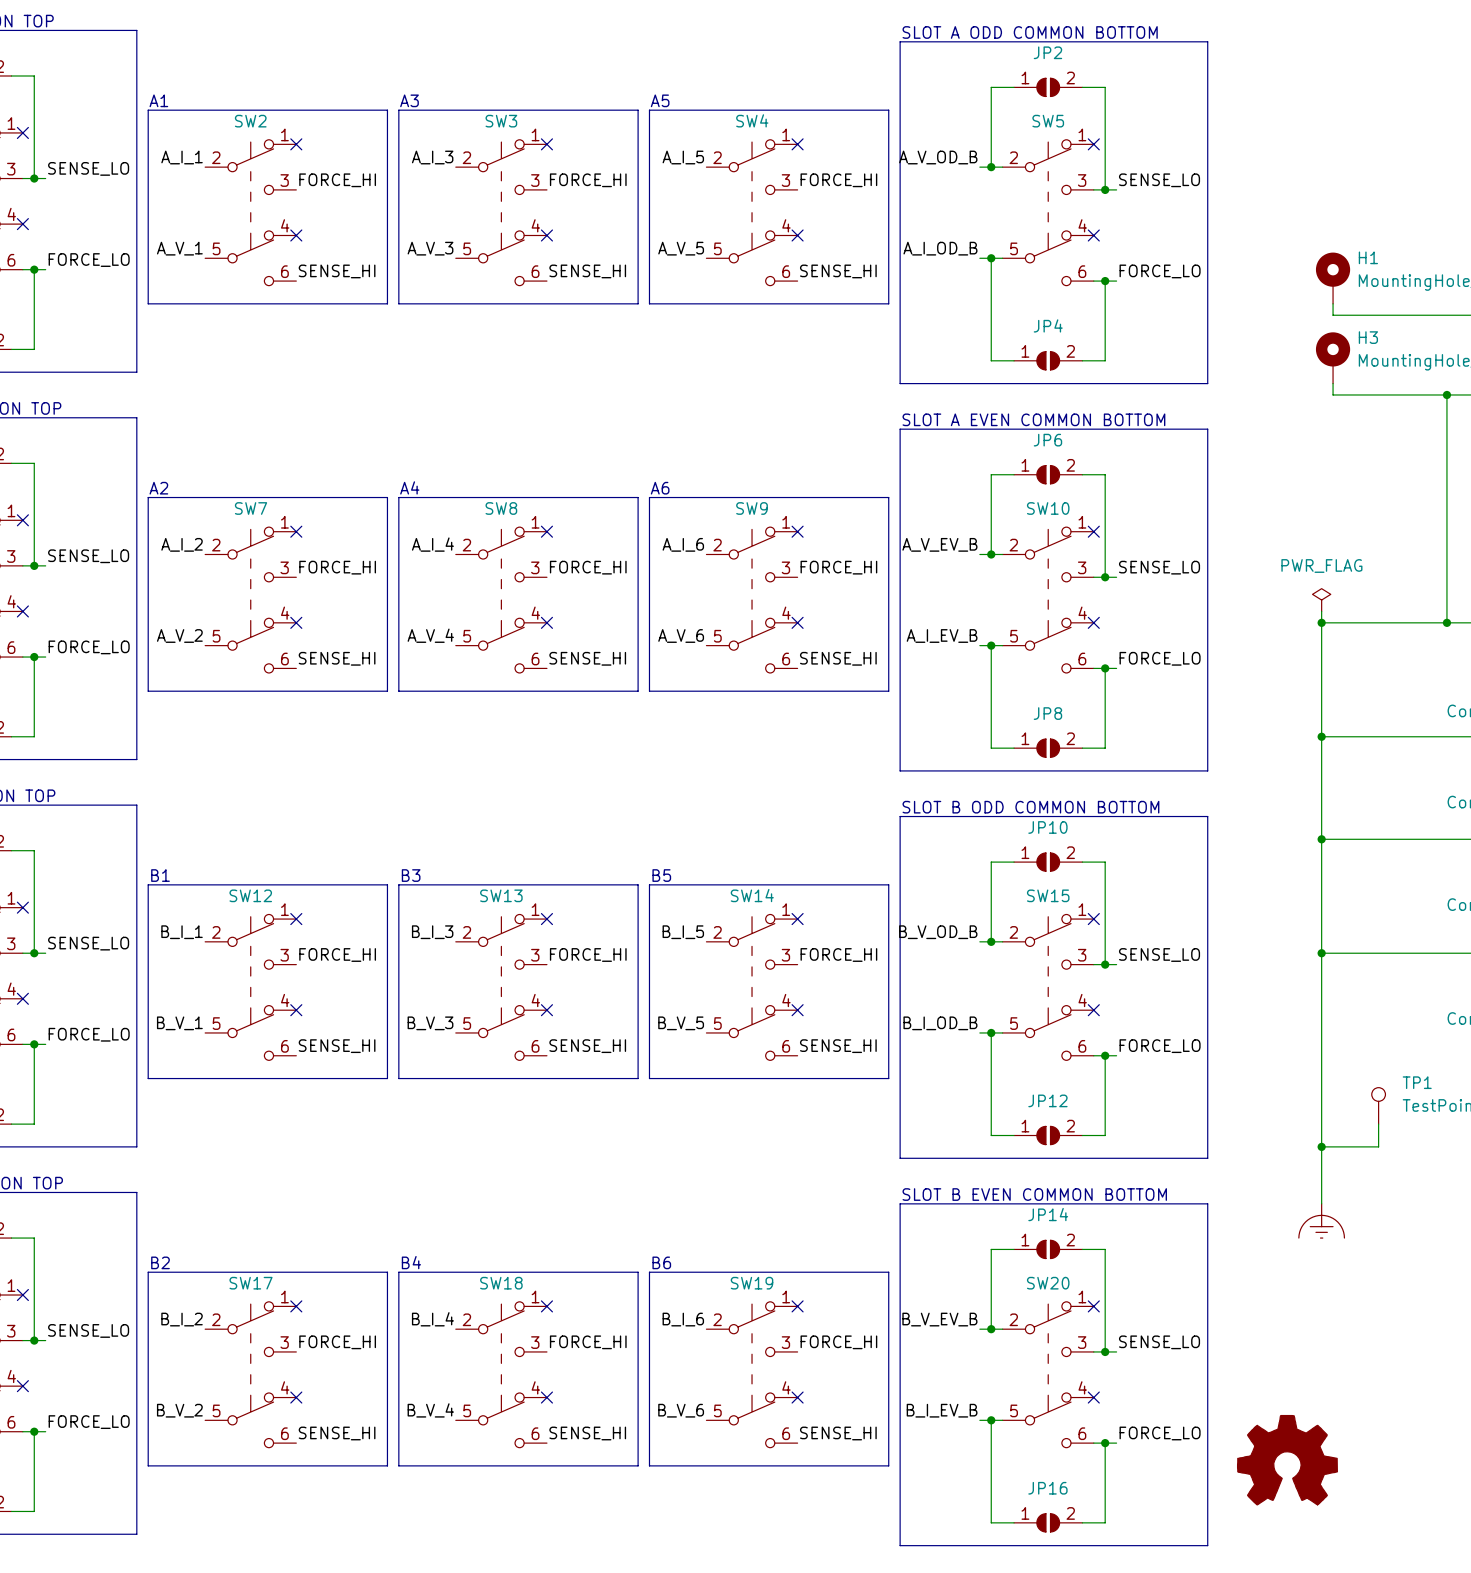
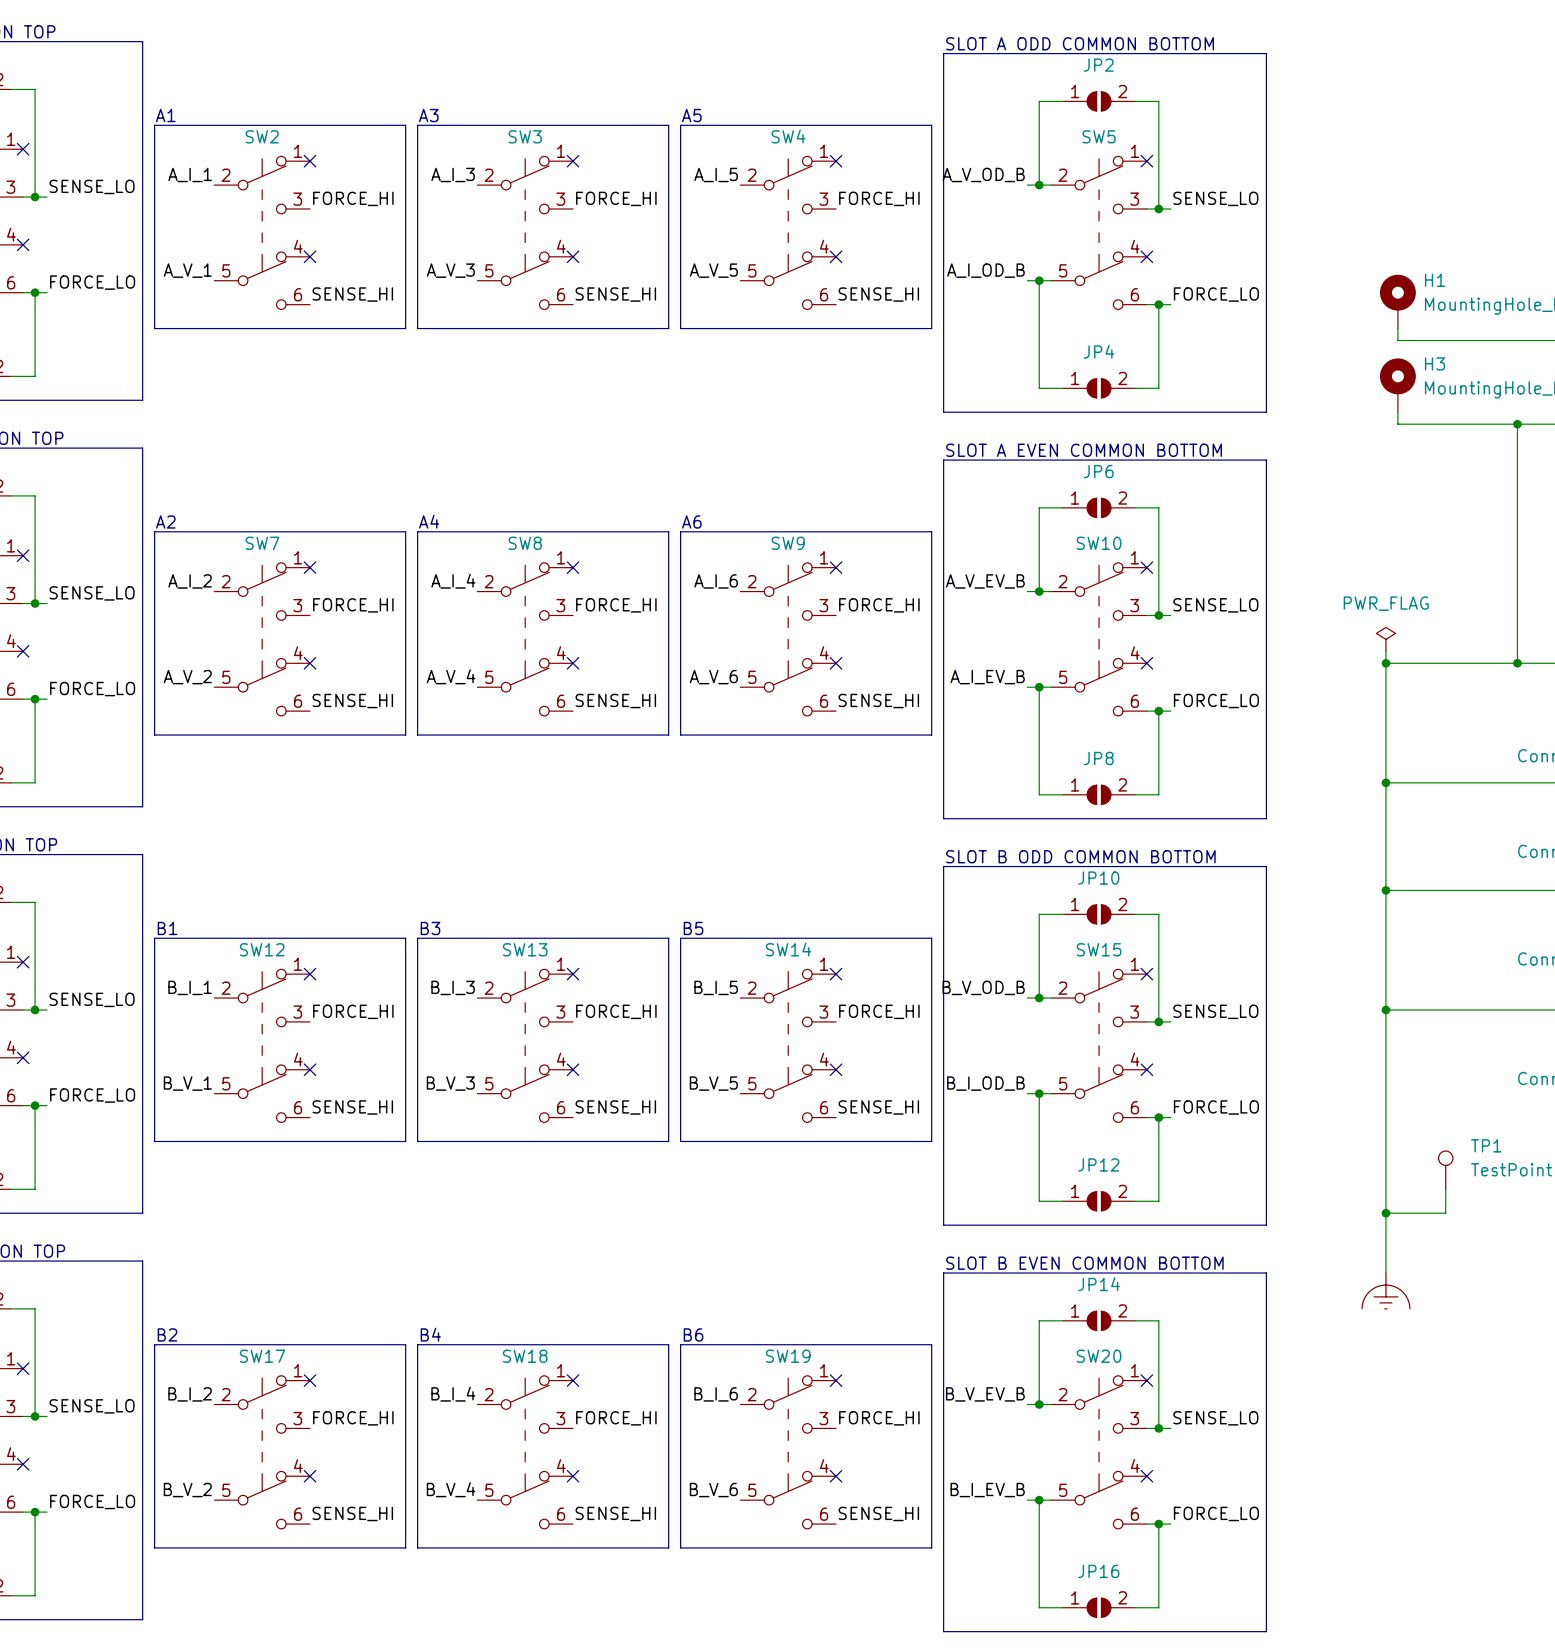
part: (1287, 1460) -> none

